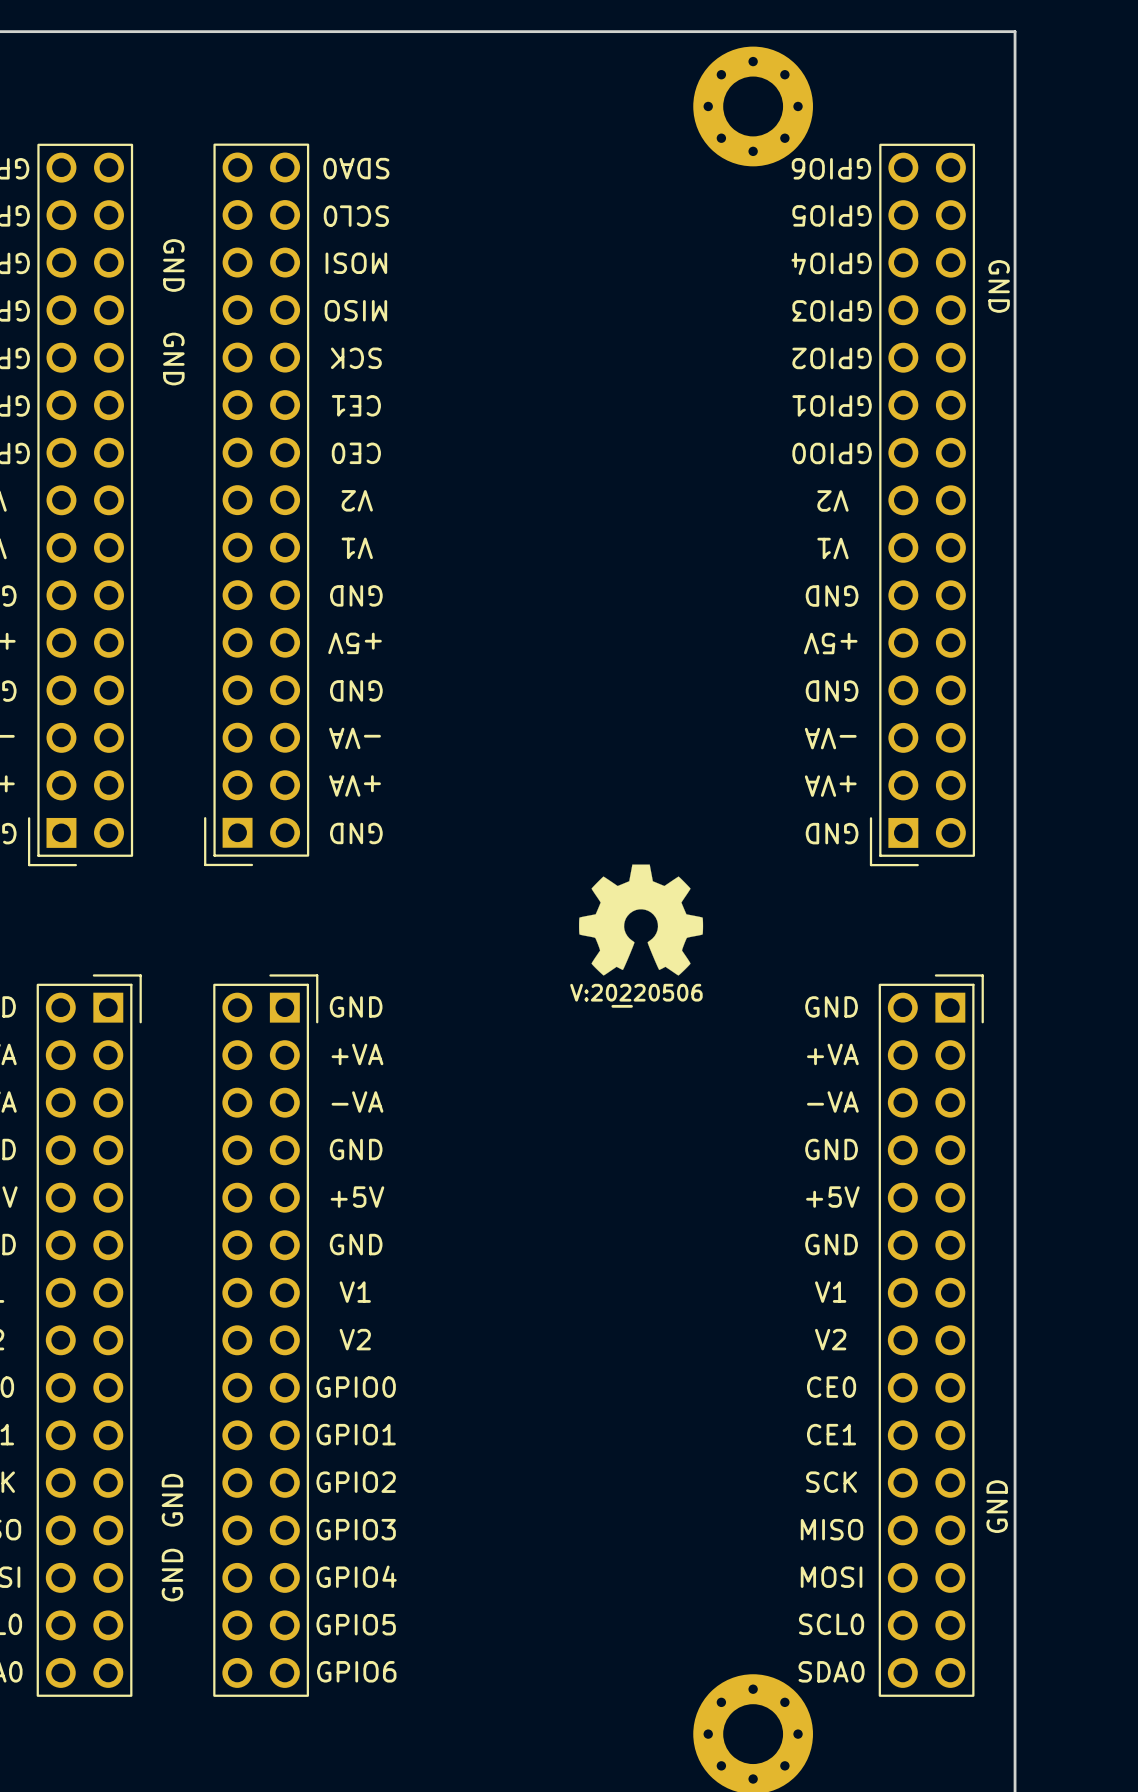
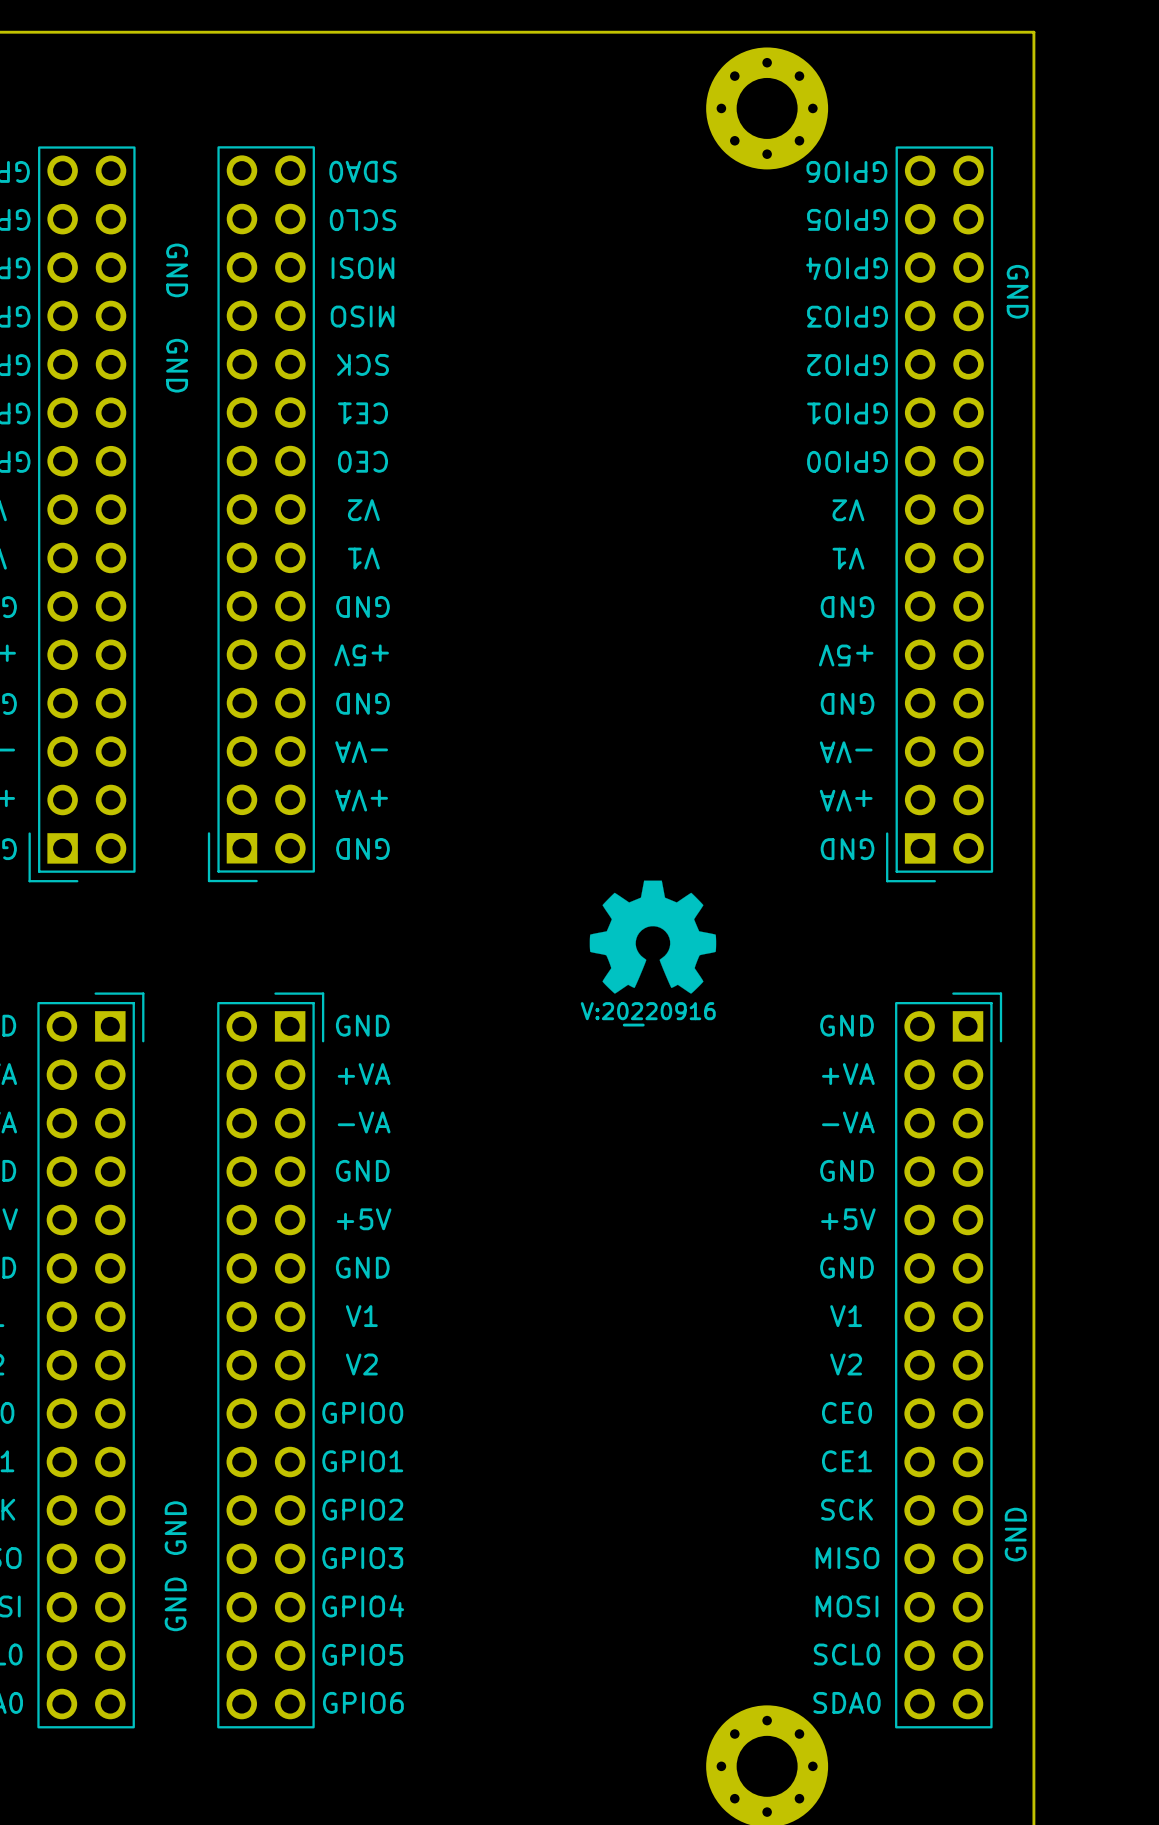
drawing shape: [570, 983, 703, 1008] -> [580, 1002, 716, 1027]

